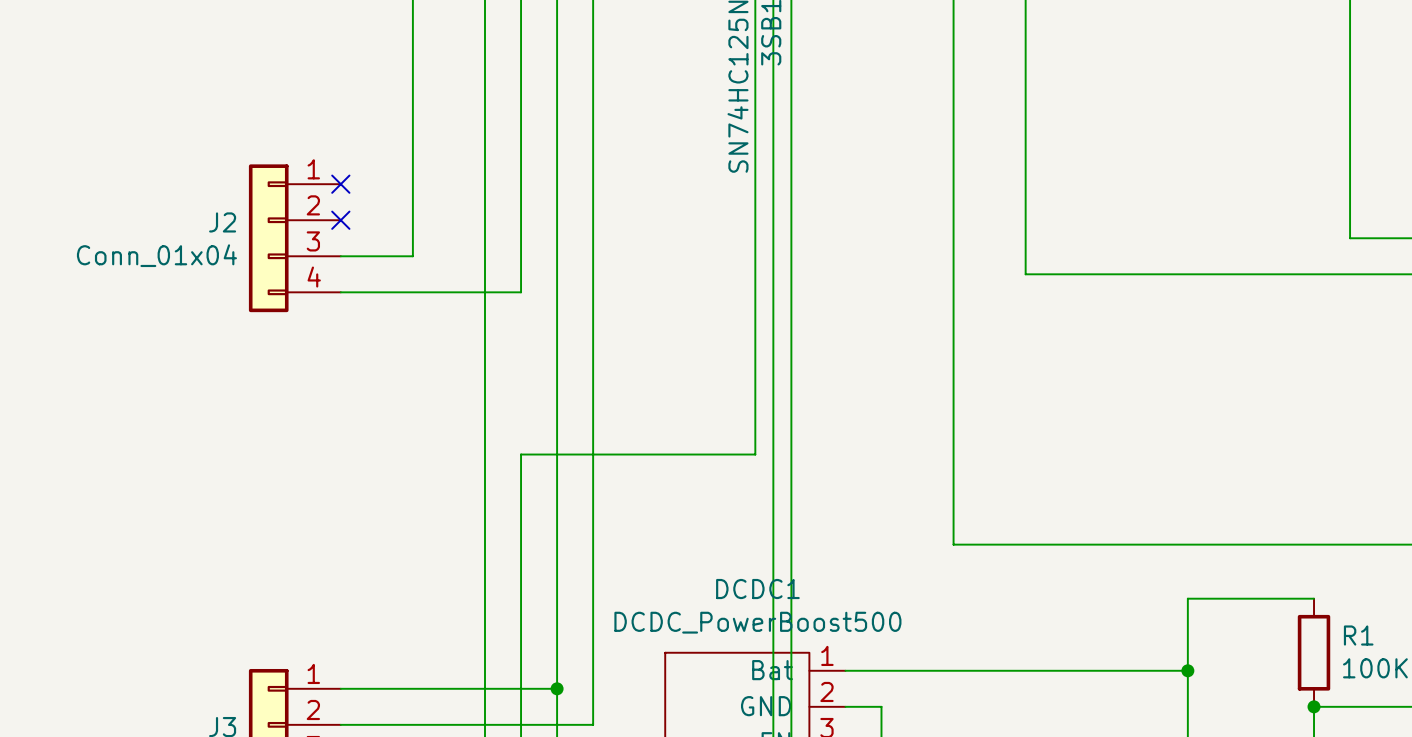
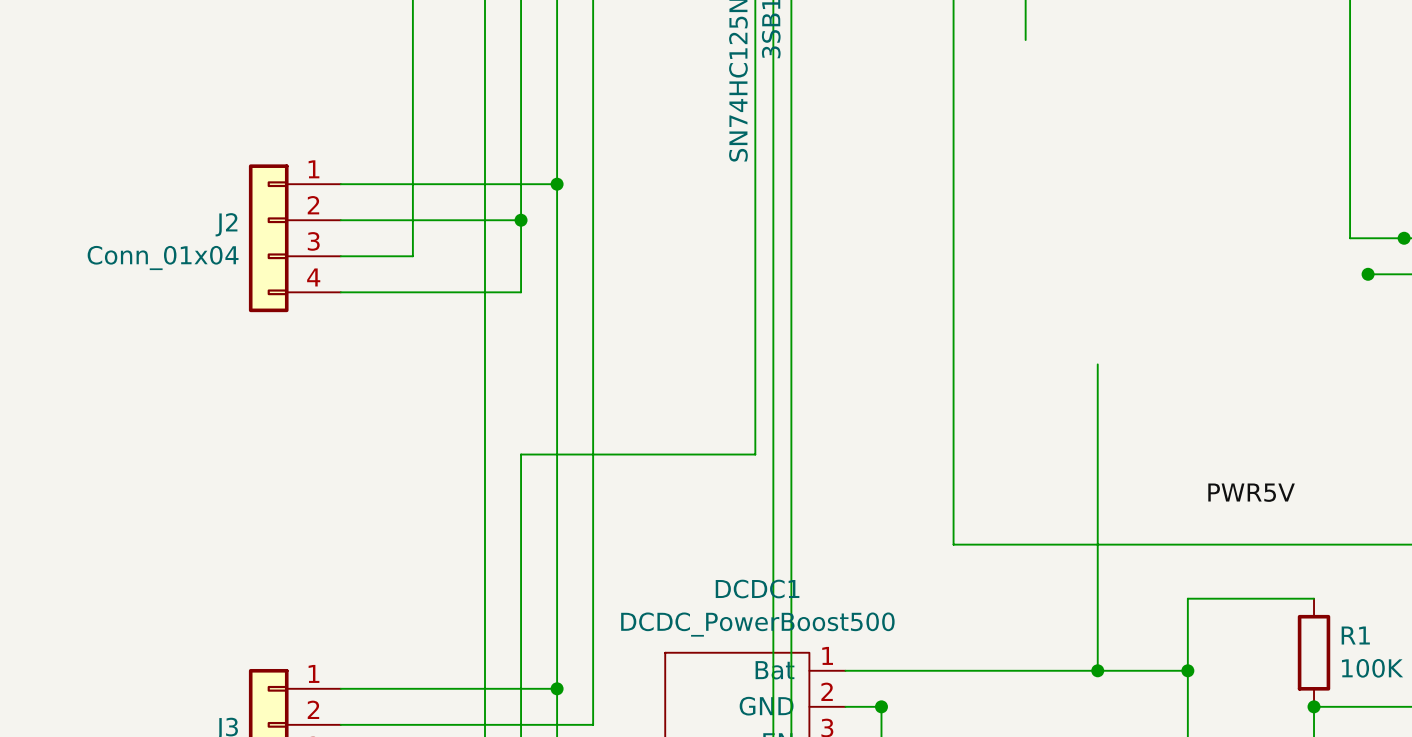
wire: (1025, 40) (1025, 274) (1368, 274) -> none
wire: none -> (340, 184) (557, 184)
no-connect mark: (340, 184) -> none
junction: none -> (557, 184)
wire: none -> (340, 220) (521, 220)
no-connect mark: (340, 220) -> none
junction: none -> (521, 220)
junction: none -> (1404, 238)
junction: none -> (1368, 274)
wire: none -> (1097, 364) (1097, 670)
label: none -> PWR5V (1251, 492)
junction: none -> (1097, 670)
junction: none -> (881, 706)

